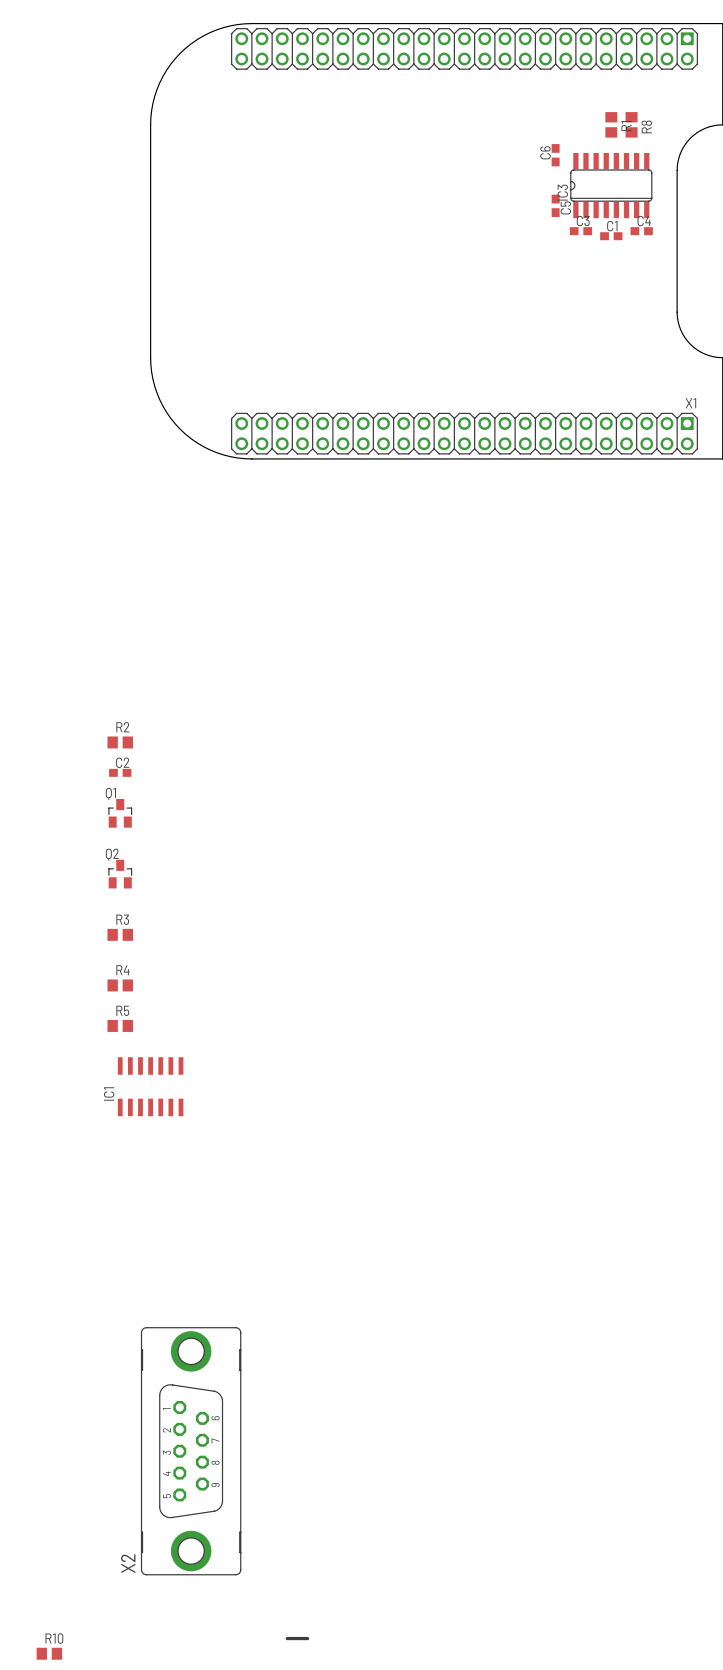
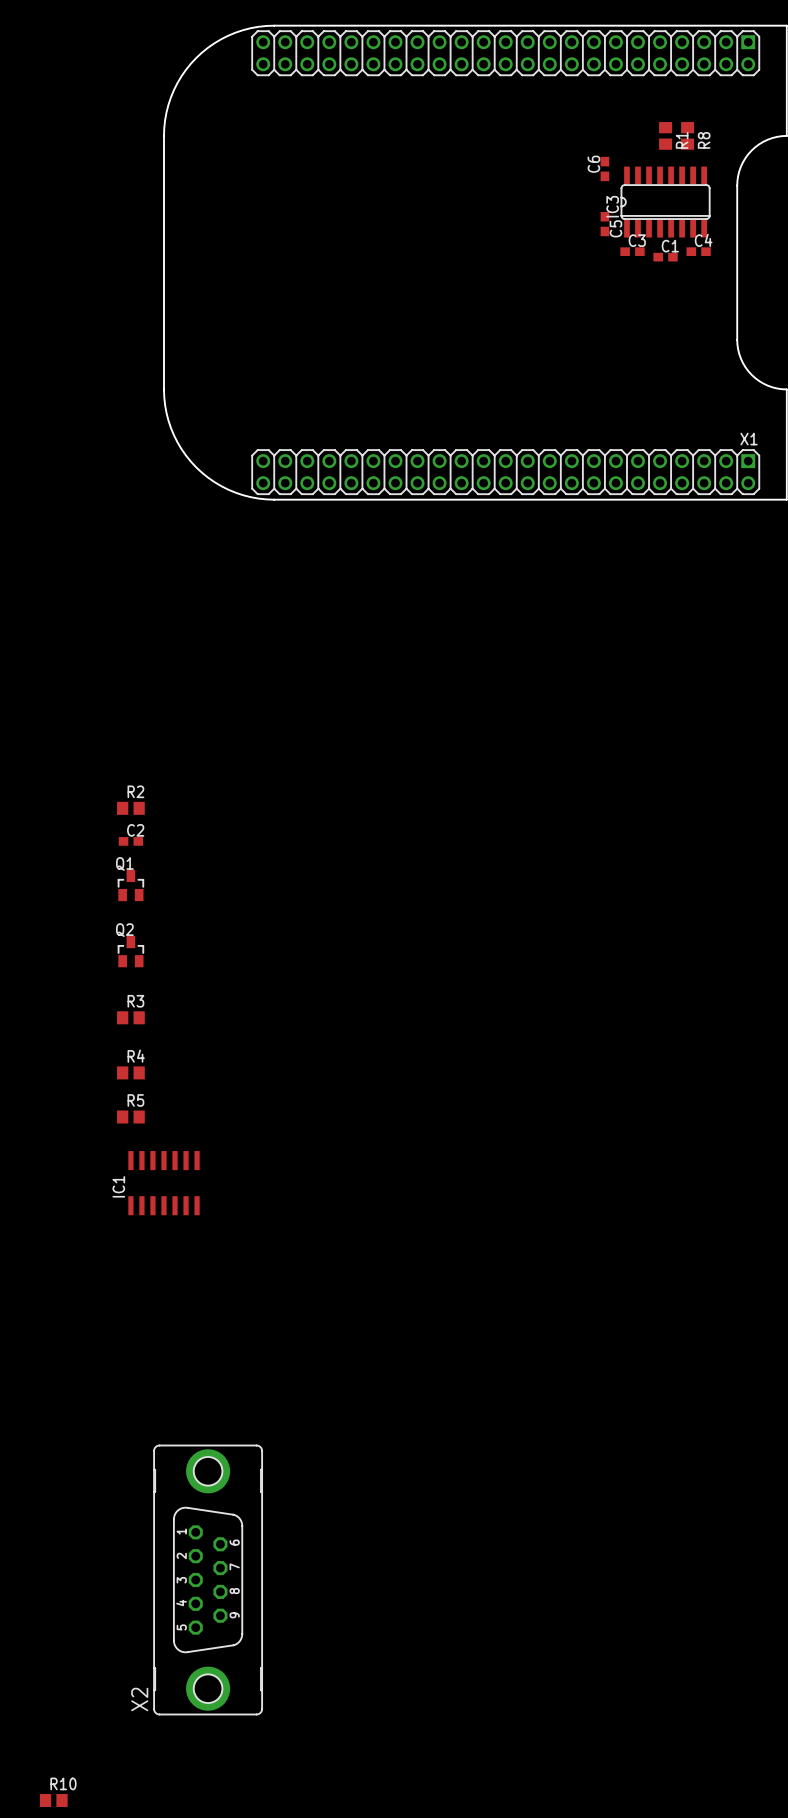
line: (287, 1638) (307, 1638) -> none

